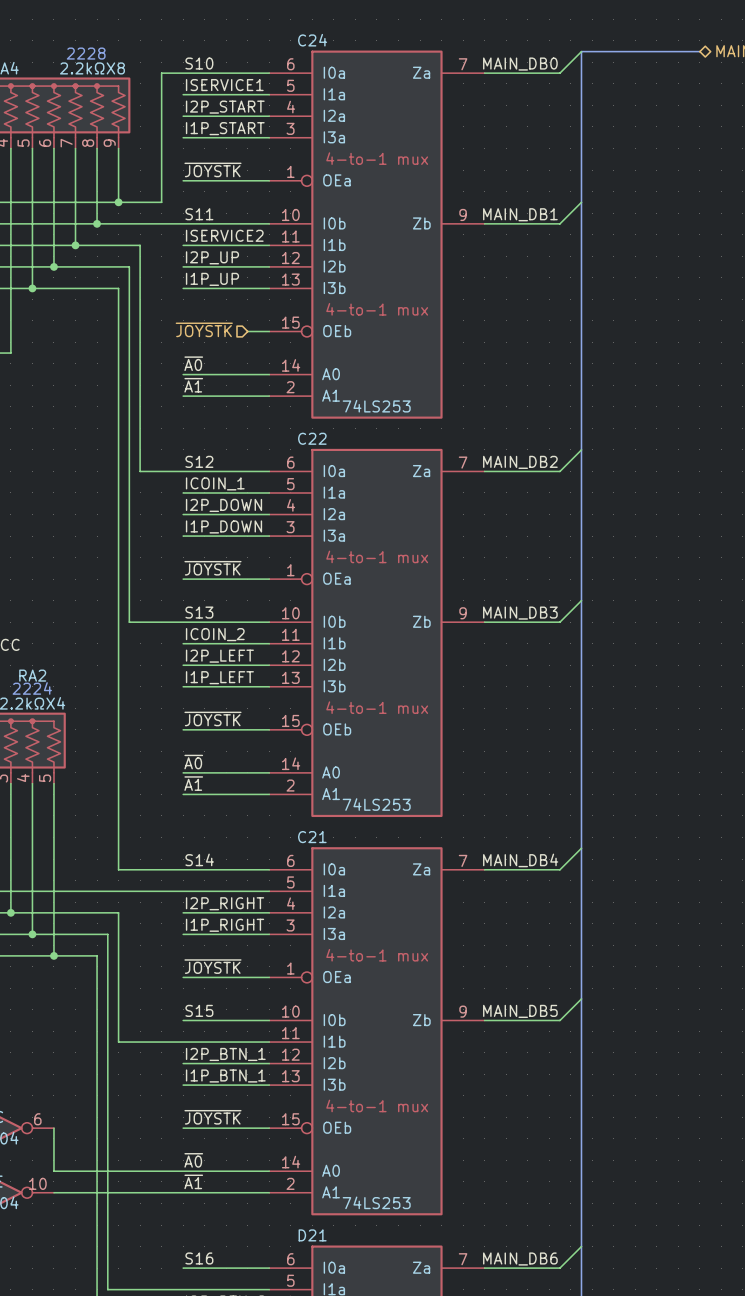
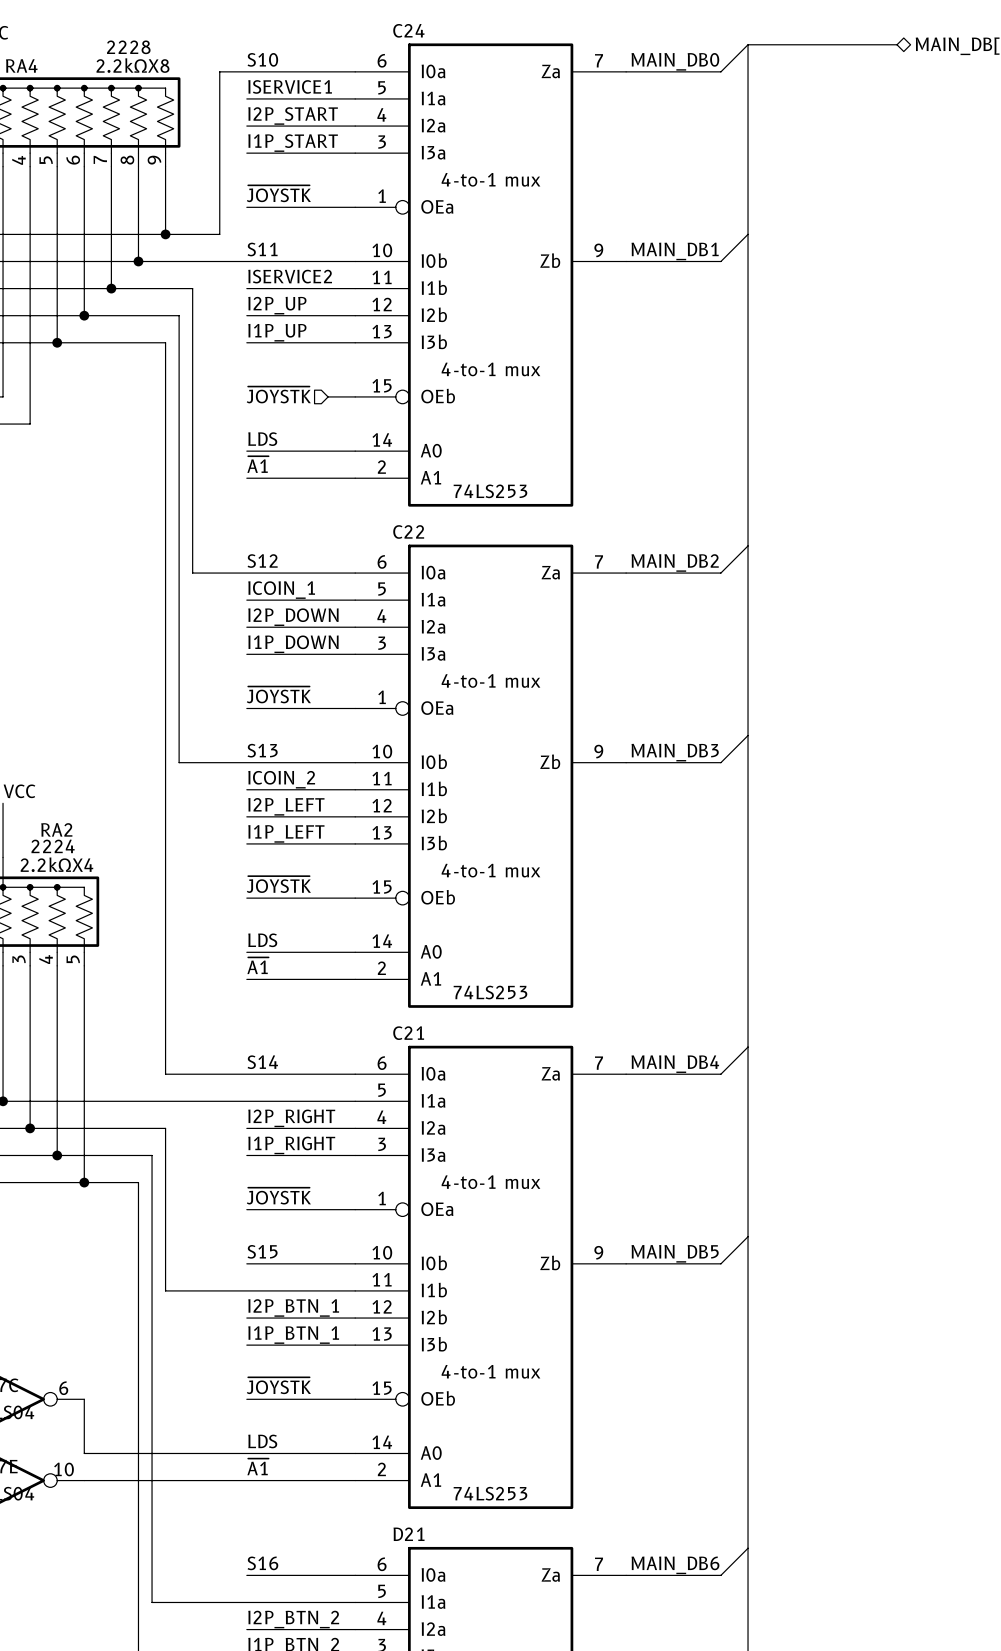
label: ~{A0} (193, 363) -> LDS (262, 439)
label: ~{A0} (193, 762) -> LDS (262, 940)
label: ~{A0} (193, 1160) -> LDS (262, 1441)

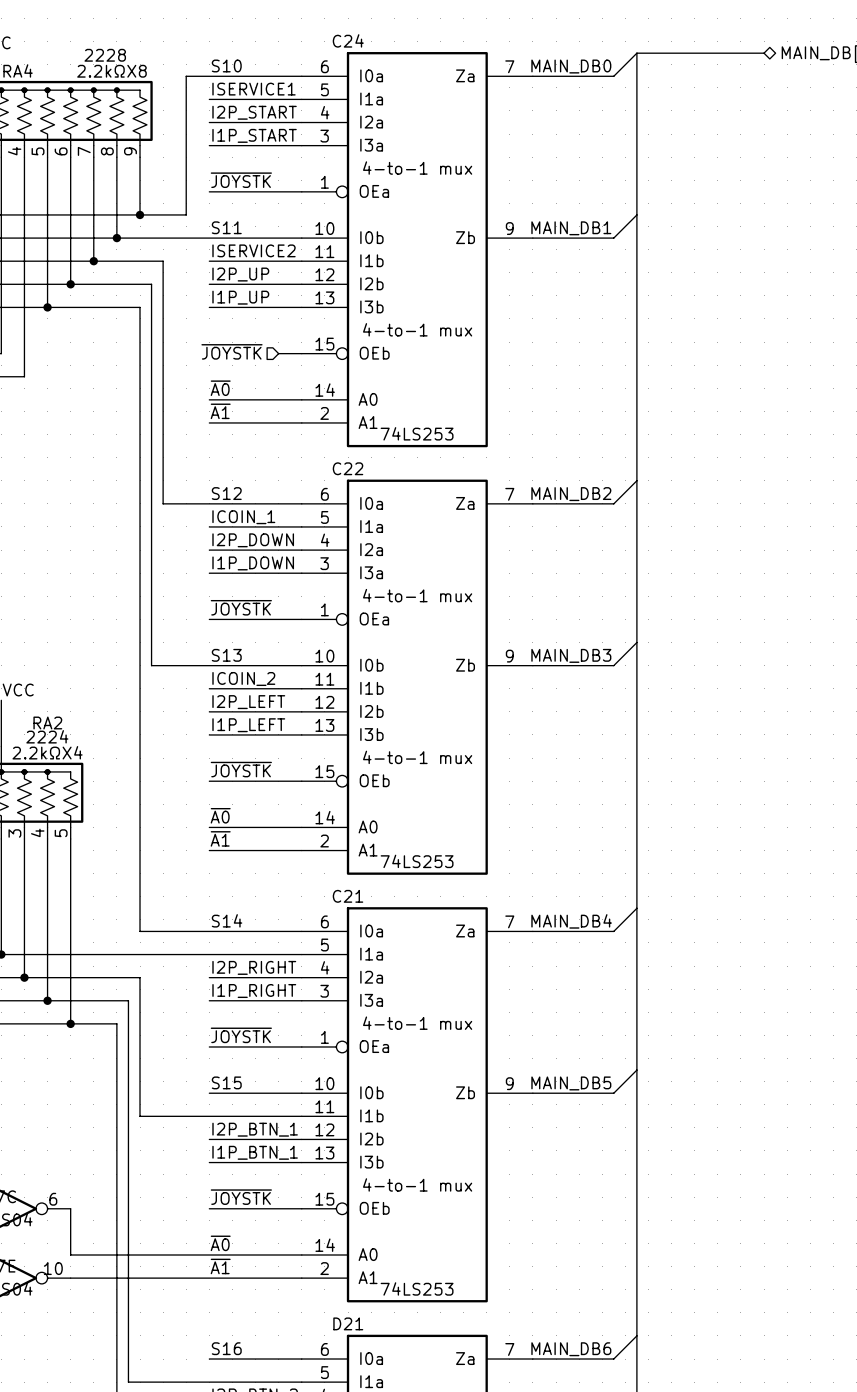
label: LDS (262, 439) -> ~{A0} (220, 388)
label: LDS (262, 940) -> ~{A0} (220, 815)
label: LDS (262, 1441) -> ~{A0} (220, 1243)

